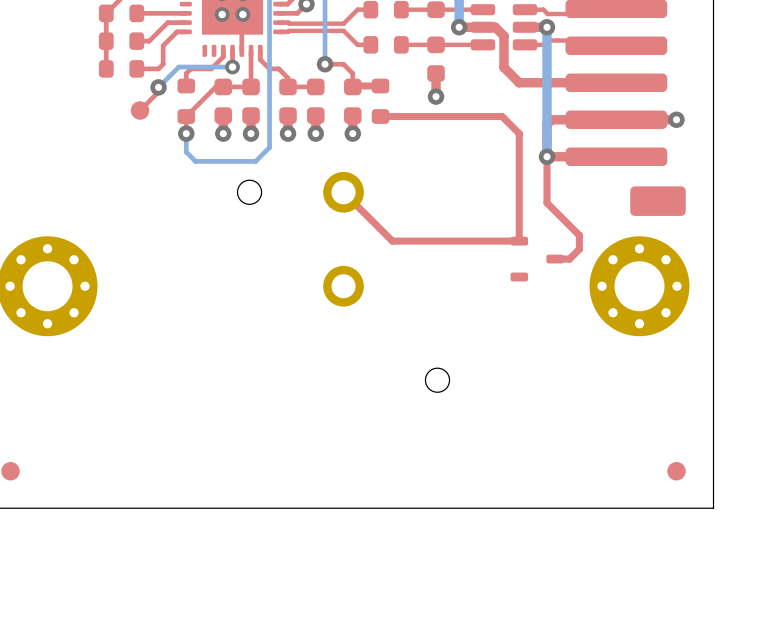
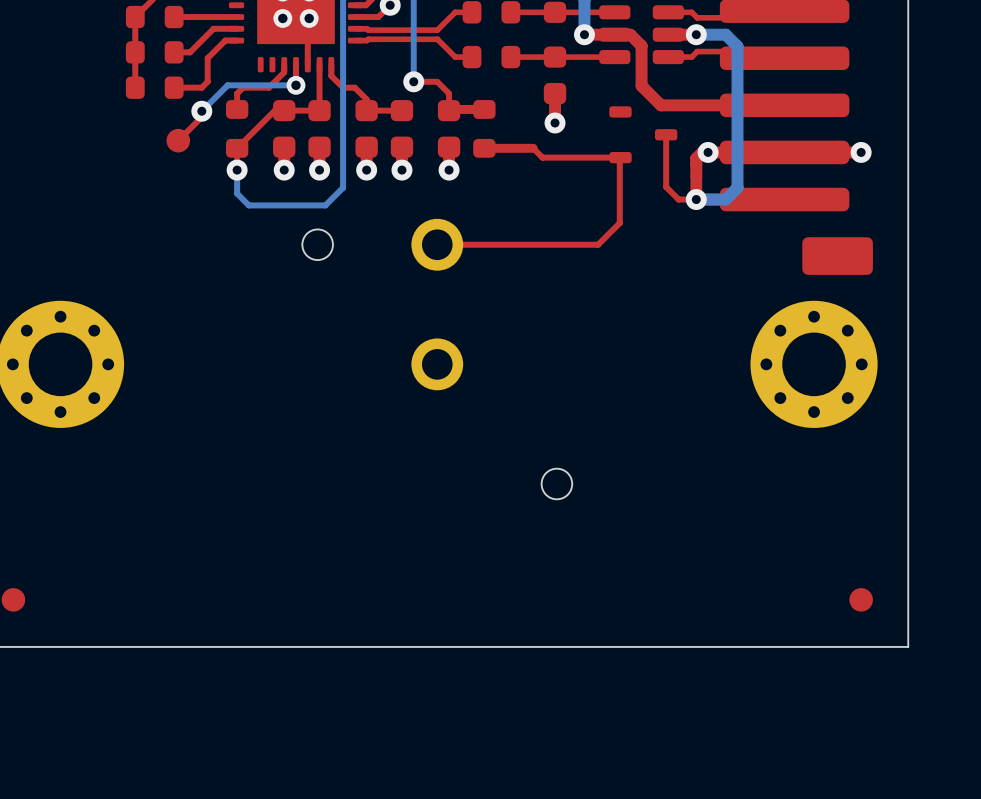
bottom track: (547, 27) (547, 156) -> (696, 34) (725, 34) (737, 46) (737, 187) (725, 199) (696, 199)
top track: (418, 116) (502, 116) (519, 133) (519, 241) (392, 241) (343, 192) -> (619, 158) (619, 223) (598, 244) (437, 244)
top track: none -> (533, 148) (542, 157) (620, 157)
via: none -> (708, 152)
top track: (547, 156) (547, 203) (579, 235) (579, 249) (569, 259) (555, 259) -> (696, 199) (678, 199) (666, 187) (666, 134)
part position: (537, 259) -> (643, 134)

